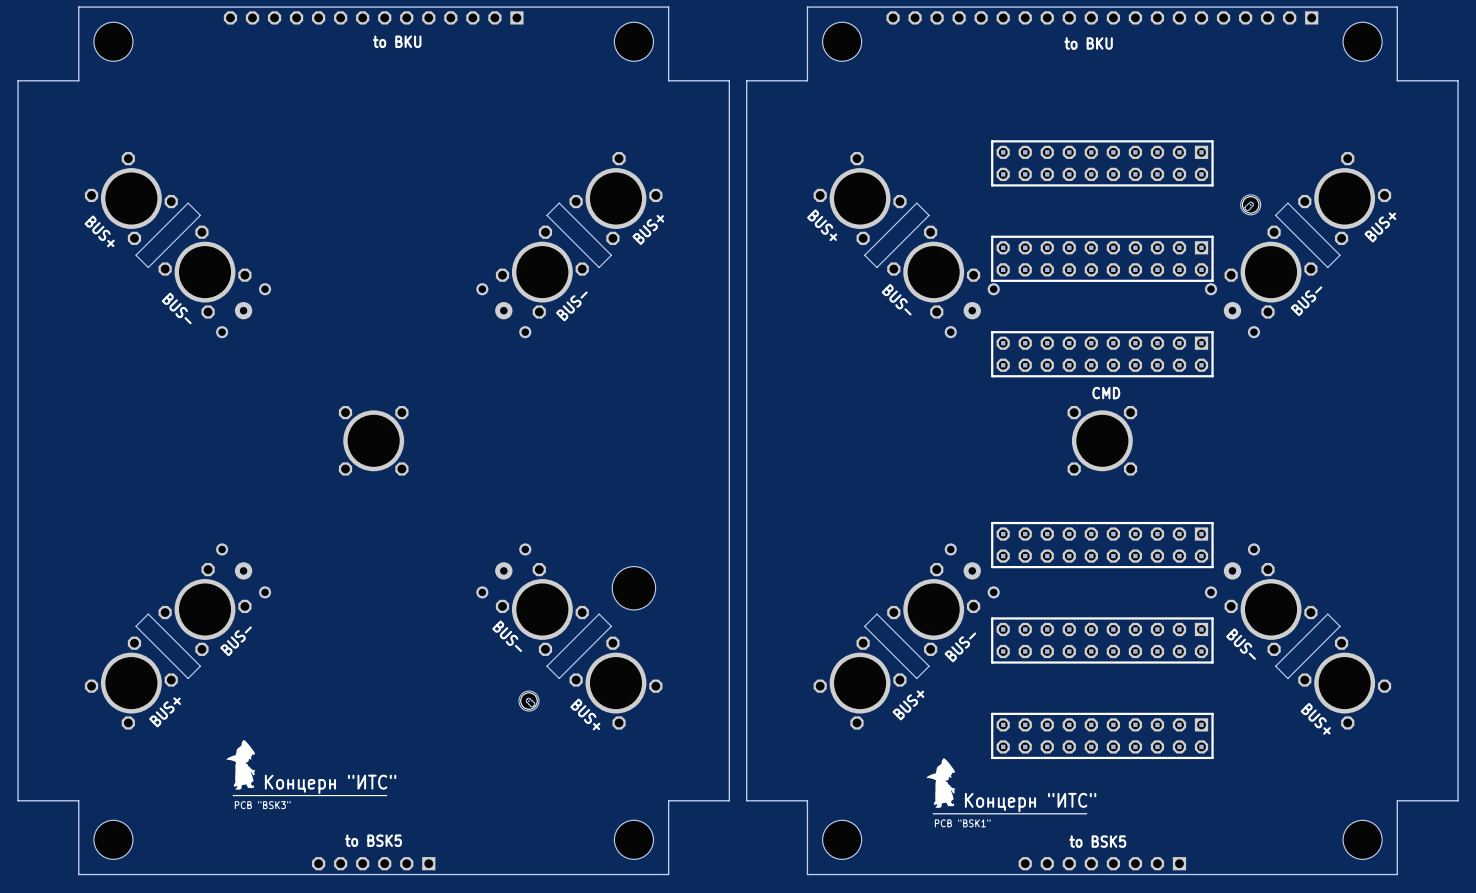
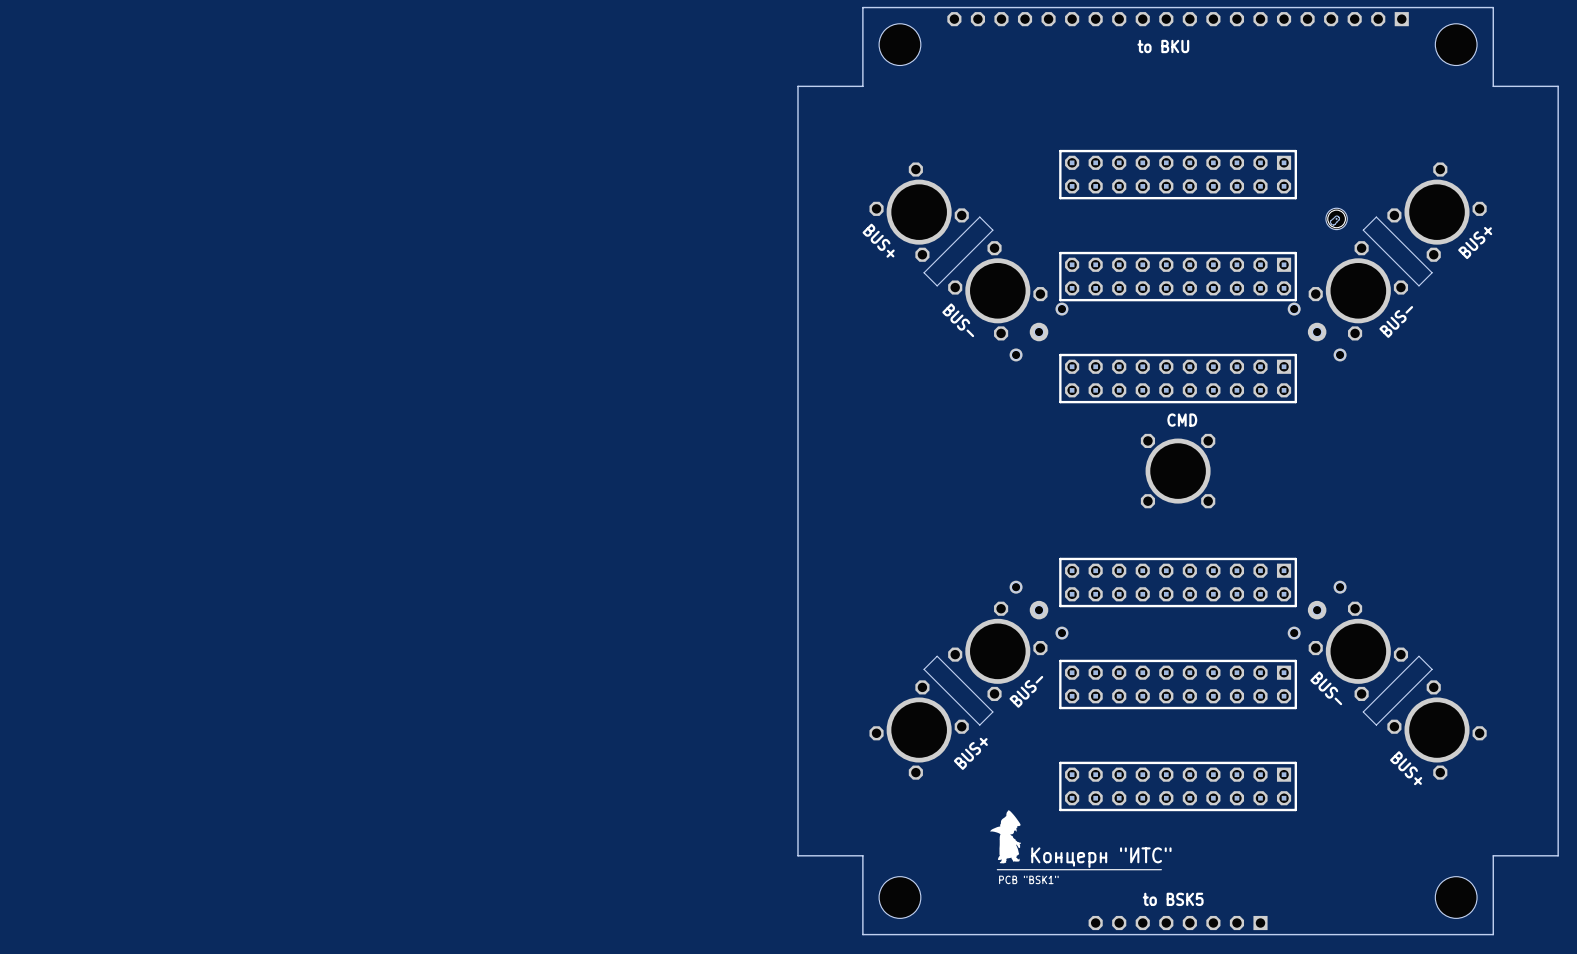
board edge: (668, 7) (668, 80) (729, 80) (729, 800) (668, 800) (668, 874) (78, 874) (78, 800) (18, 800) (18, 80) (78, 80) (78, 7) (668, 7) -> none
part: (373, 17) -> none
hole: (113, 41) -> none
text: to BKU (397, 41) -> none
hole: (633, 41) -> none
part: (131, 198) -> none
part: (615, 198) -> none
board edge: (188, 203) (200, 215) (148, 267) (136, 255) (188, 203) -> none
board edge: (559, 203) (546, 215) (599, 267) (611, 255) (559, 203) -> none
text: BUS+ (648, 229) -> none
text: BUS+ (99, 231) -> none
part: (205, 272) -> none
part: (542, 272) -> none
text: BUS- (571, 306) -> none
text: BUS- (176, 308) -> none
part: (243, 310) -> none
part: (503, 310) -> none
part: (373, 440) -> none
part: (243, 570) -> none
part: (503, 570) -> none
hole: (633, 588) -> none
part: (205, 609) -> none
part: (542, 609) -> none
board edge: (148, 614) (200, 666) (188, 678) (136, 626) (148, 614) -> none
board edge: (599, 614) (611, 626) (559, 678) (546, 666) (599, 614) -> none
text: BUS- (507, 636) -> none
text: BUS- (236, 641) -> none
part: (131, 683) -> none
part: (615, 683) -> none
part: (528, 701) -> none
text: BUS+ (165, 712) -> none
text: BUS+ (585, 714) -> none
drawing: [226, 740, 388, 797] -> none
hole: (113, 839) -> none
hole: (633, 839) -> none
text: to BSK5 (373, 840) -> none
part: (373, 863) -> none

